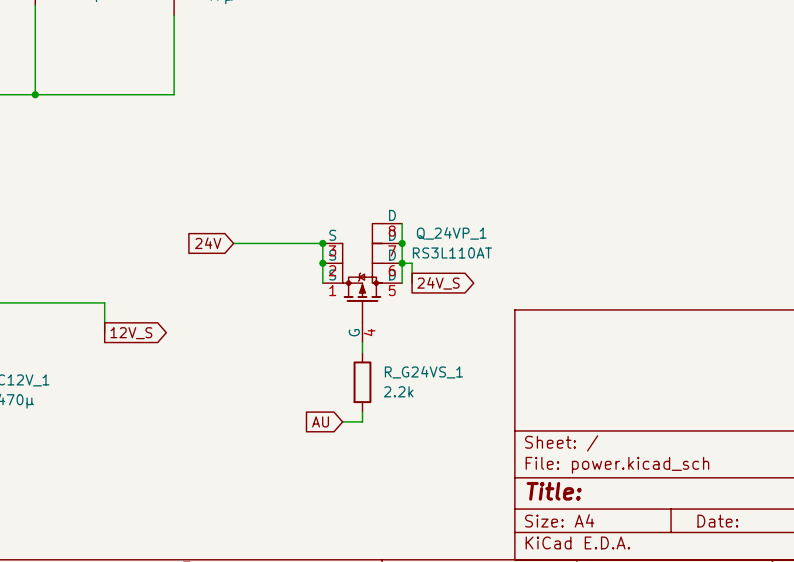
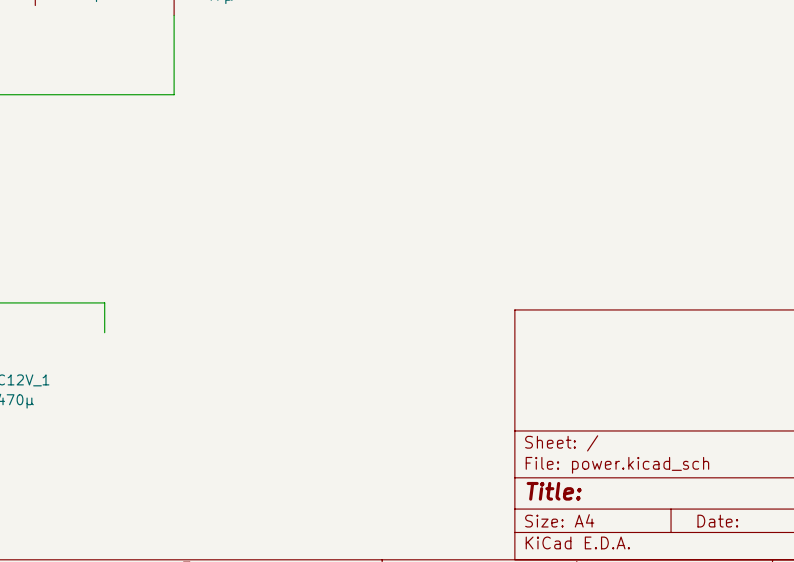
wire: (35, 5) (35, 94) -> none
junction: (35, 94) -> none
wire: (402, 223) (402, 283) -> none
global label: 24V (208, 243) -> none
wire: (233, 243) (322, 243) (322, 283) -> none
junction: (322, 243) -> none
junction: (402, 243) -> none
junction: (322, 263) -> none
wire: (402, 263) (412, 263) (412, 283) -> none
junction: (402, 263) -> none
Q_24VP_1: RS3L110AT (362, 283) -> none
global label: 24V_S (438, 283) -> none
global label: 12V_S (131, 333) -> none
wire: (362, 342) (362, 352) -> none
R_G24VS_1: 2.2k (362, 382) -> none
wire: (362, 412) (362, 421) (342, 421) -> none
global label: AU (320, 421) -> none

